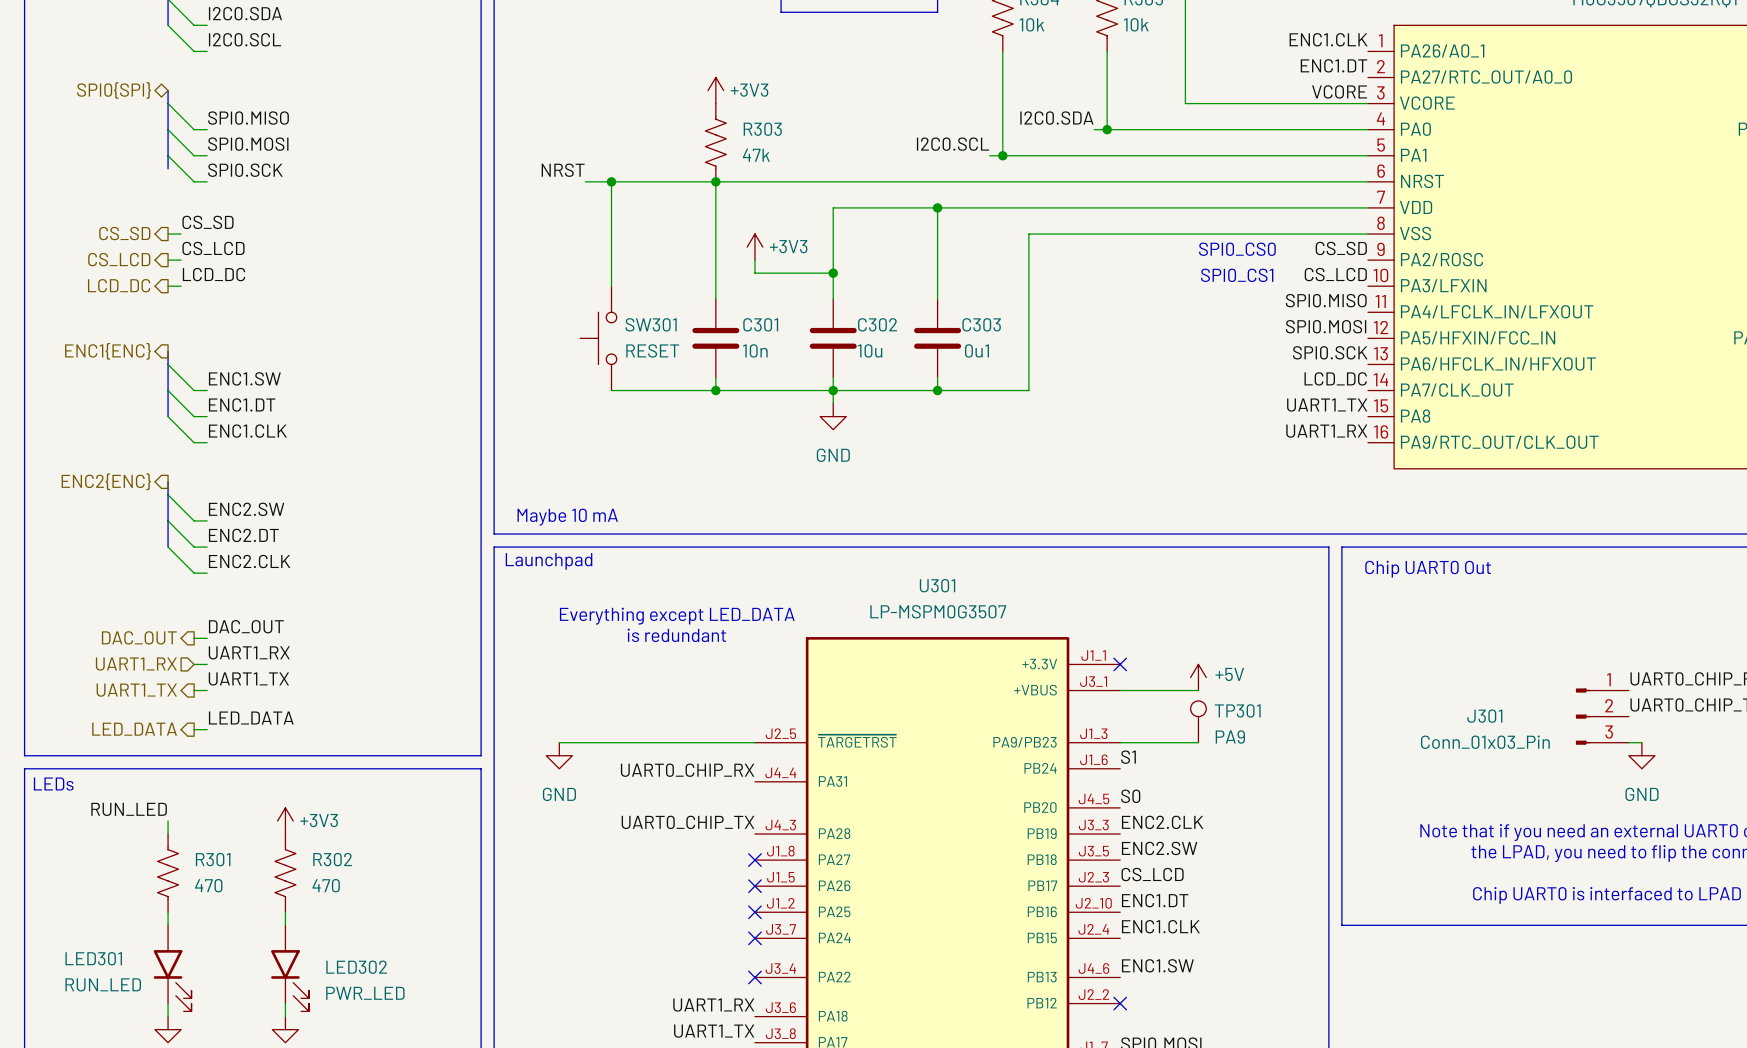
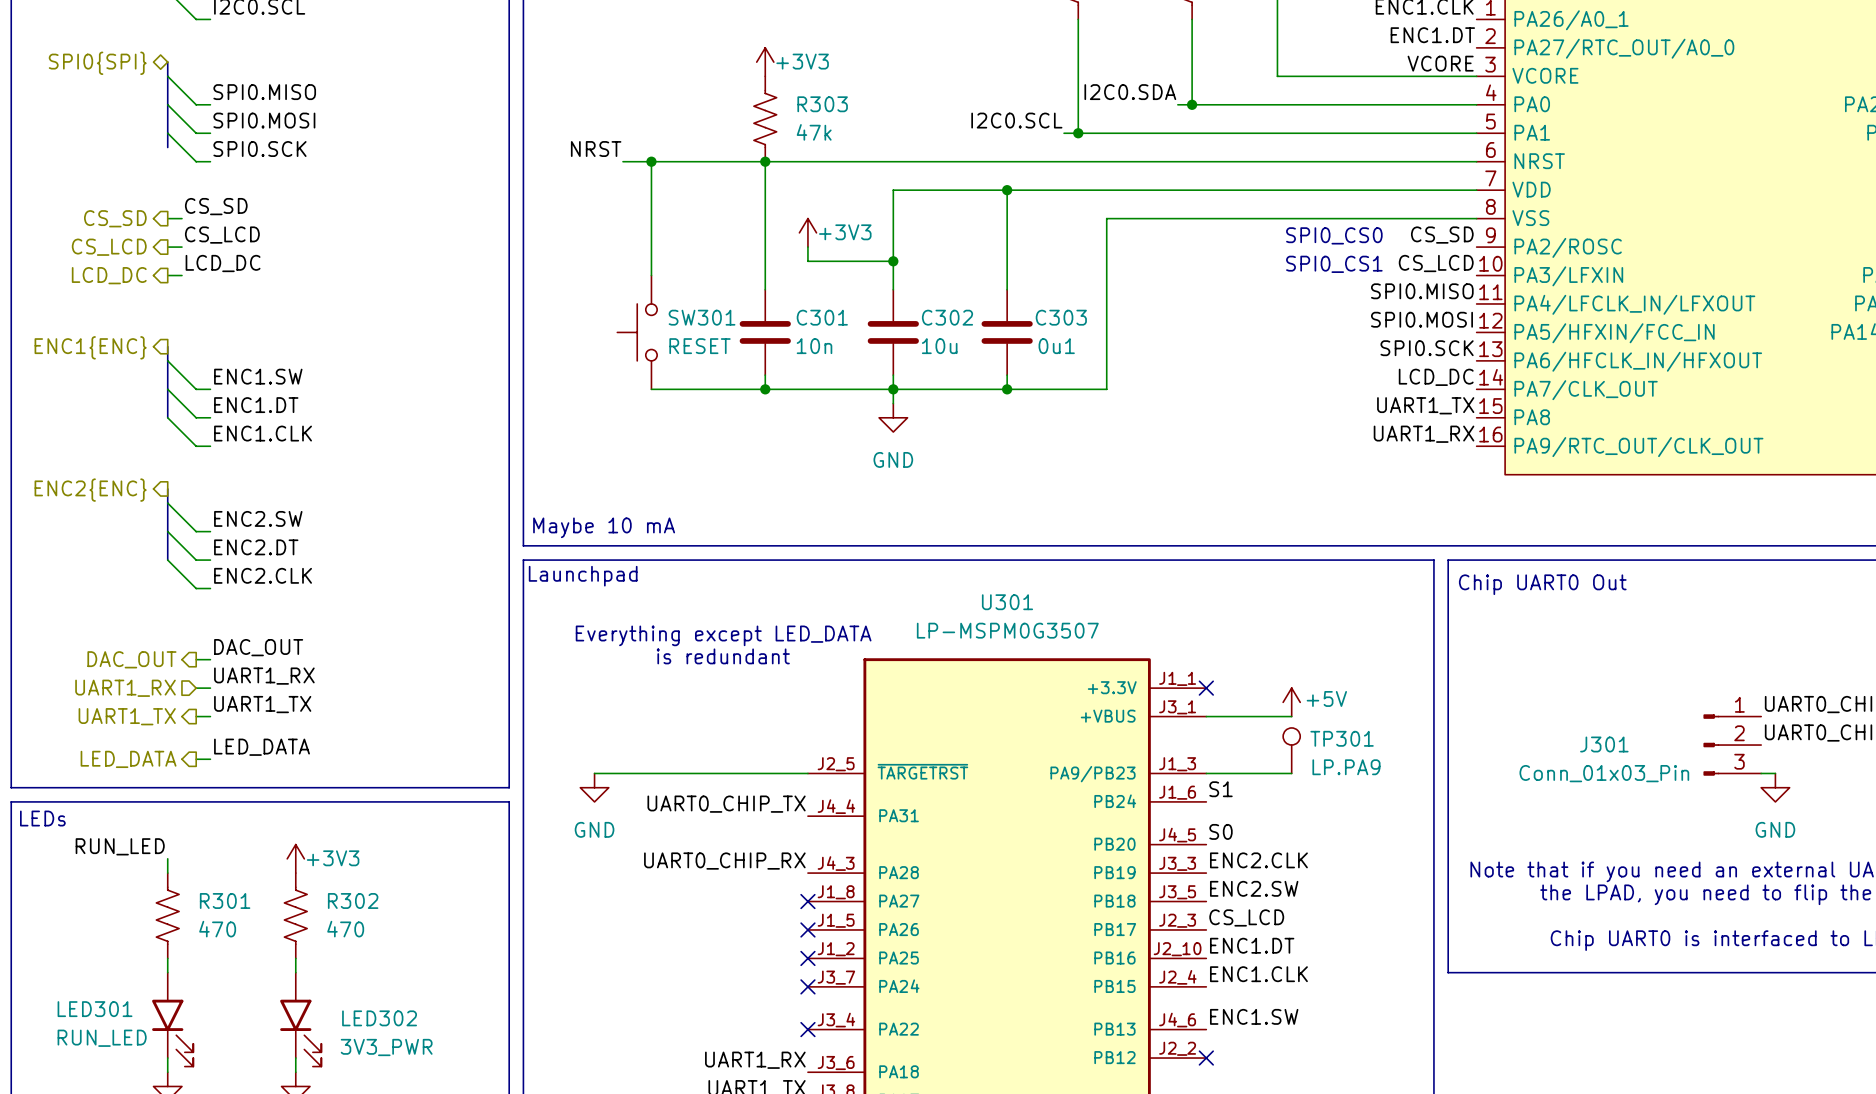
TP301 value: PA9 (1230, 737) -> LP.PA9 (1346, 767)
label: UART0_CHIP_RX (687, 770) -> UART0_CHIP_TX (726, 804)
label: UART0_CHIP_TX (687, 822) -> UART0_CHIP_RX (724, 861)
LED302 value: PWR_LED (365, 993) -> 3V3_PWR (386, 1047)

